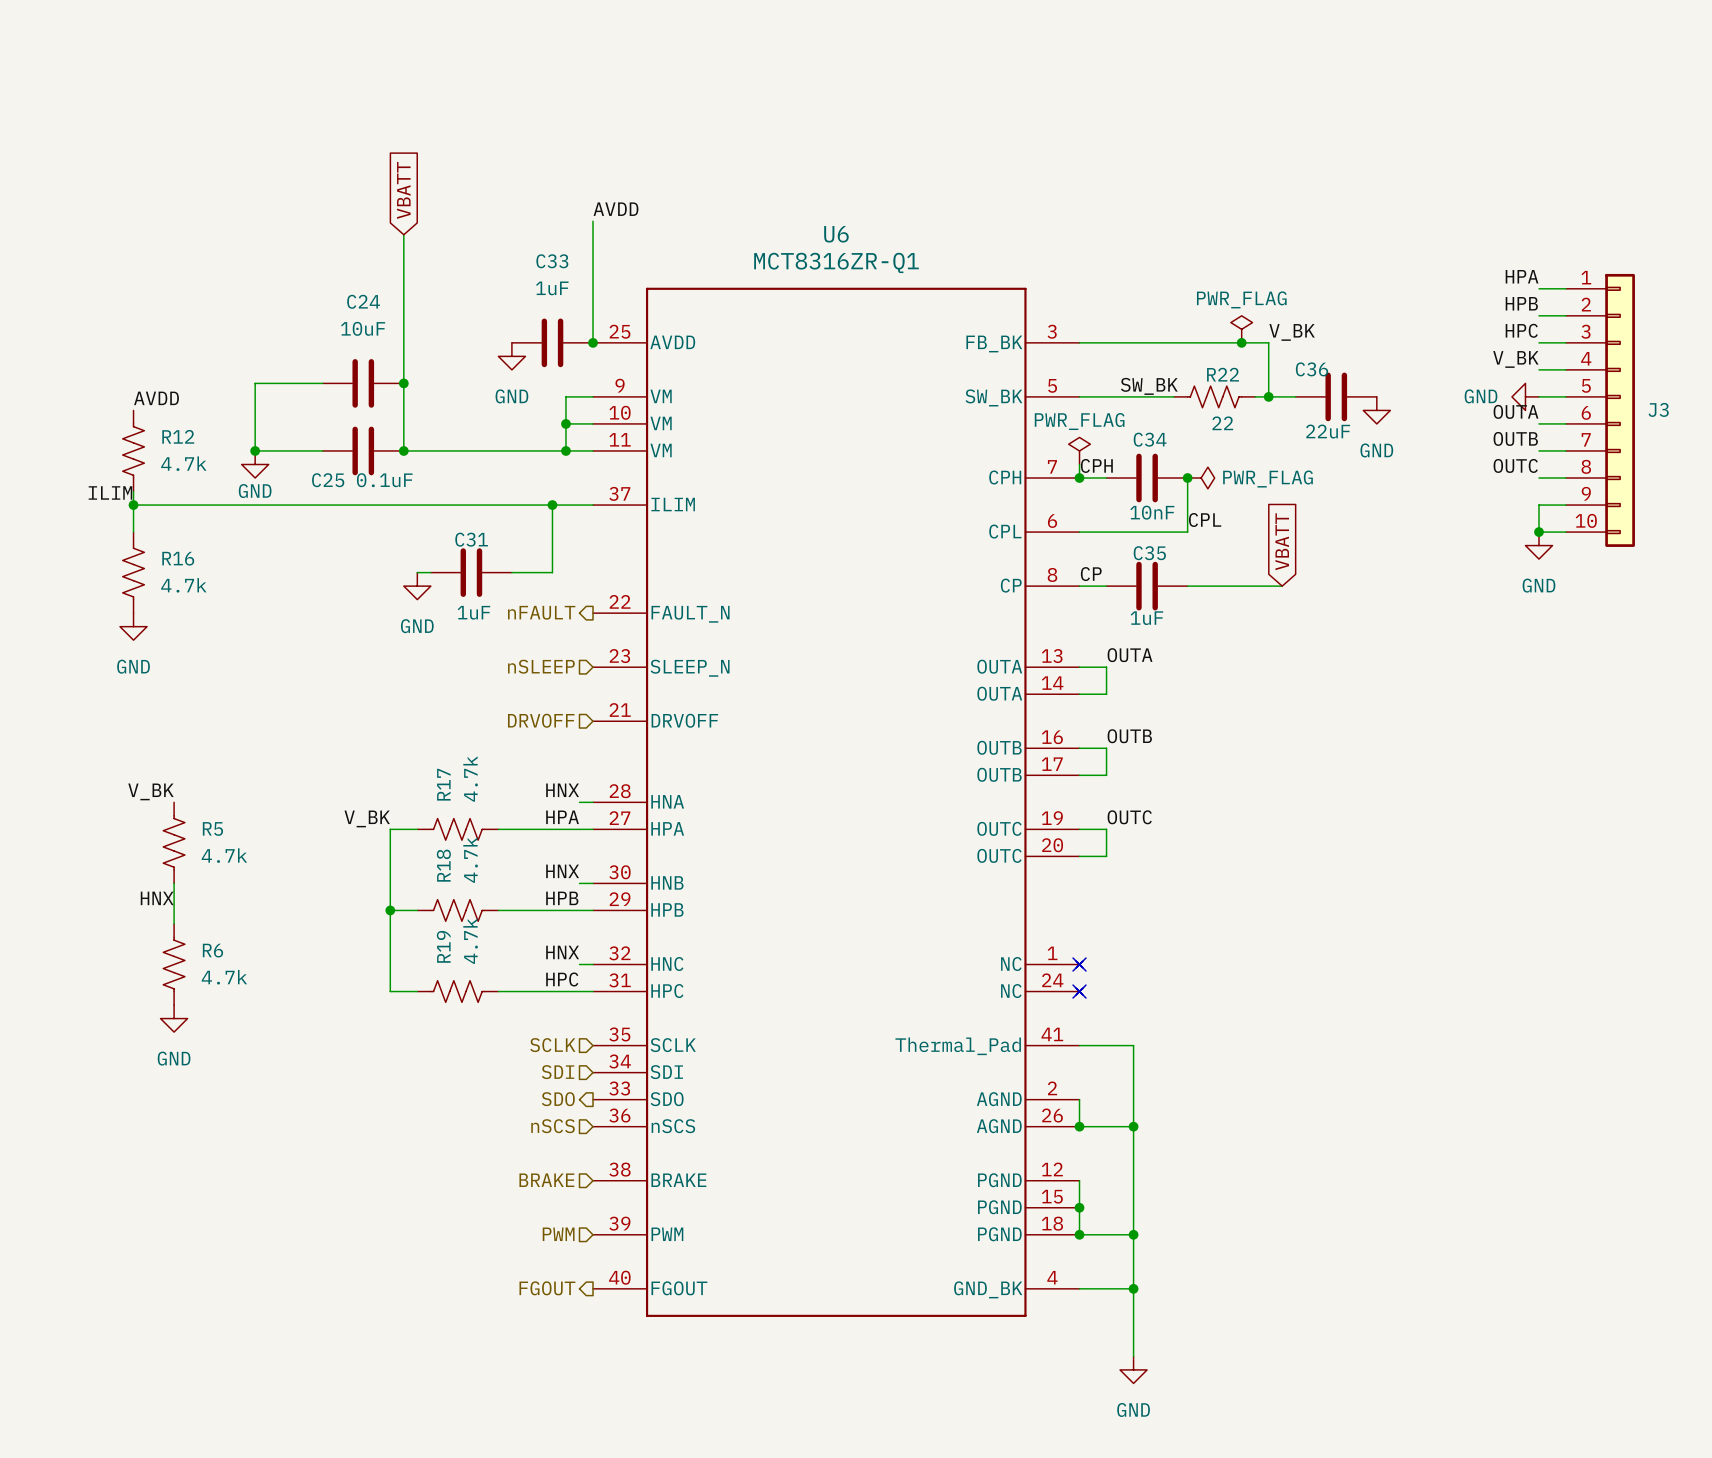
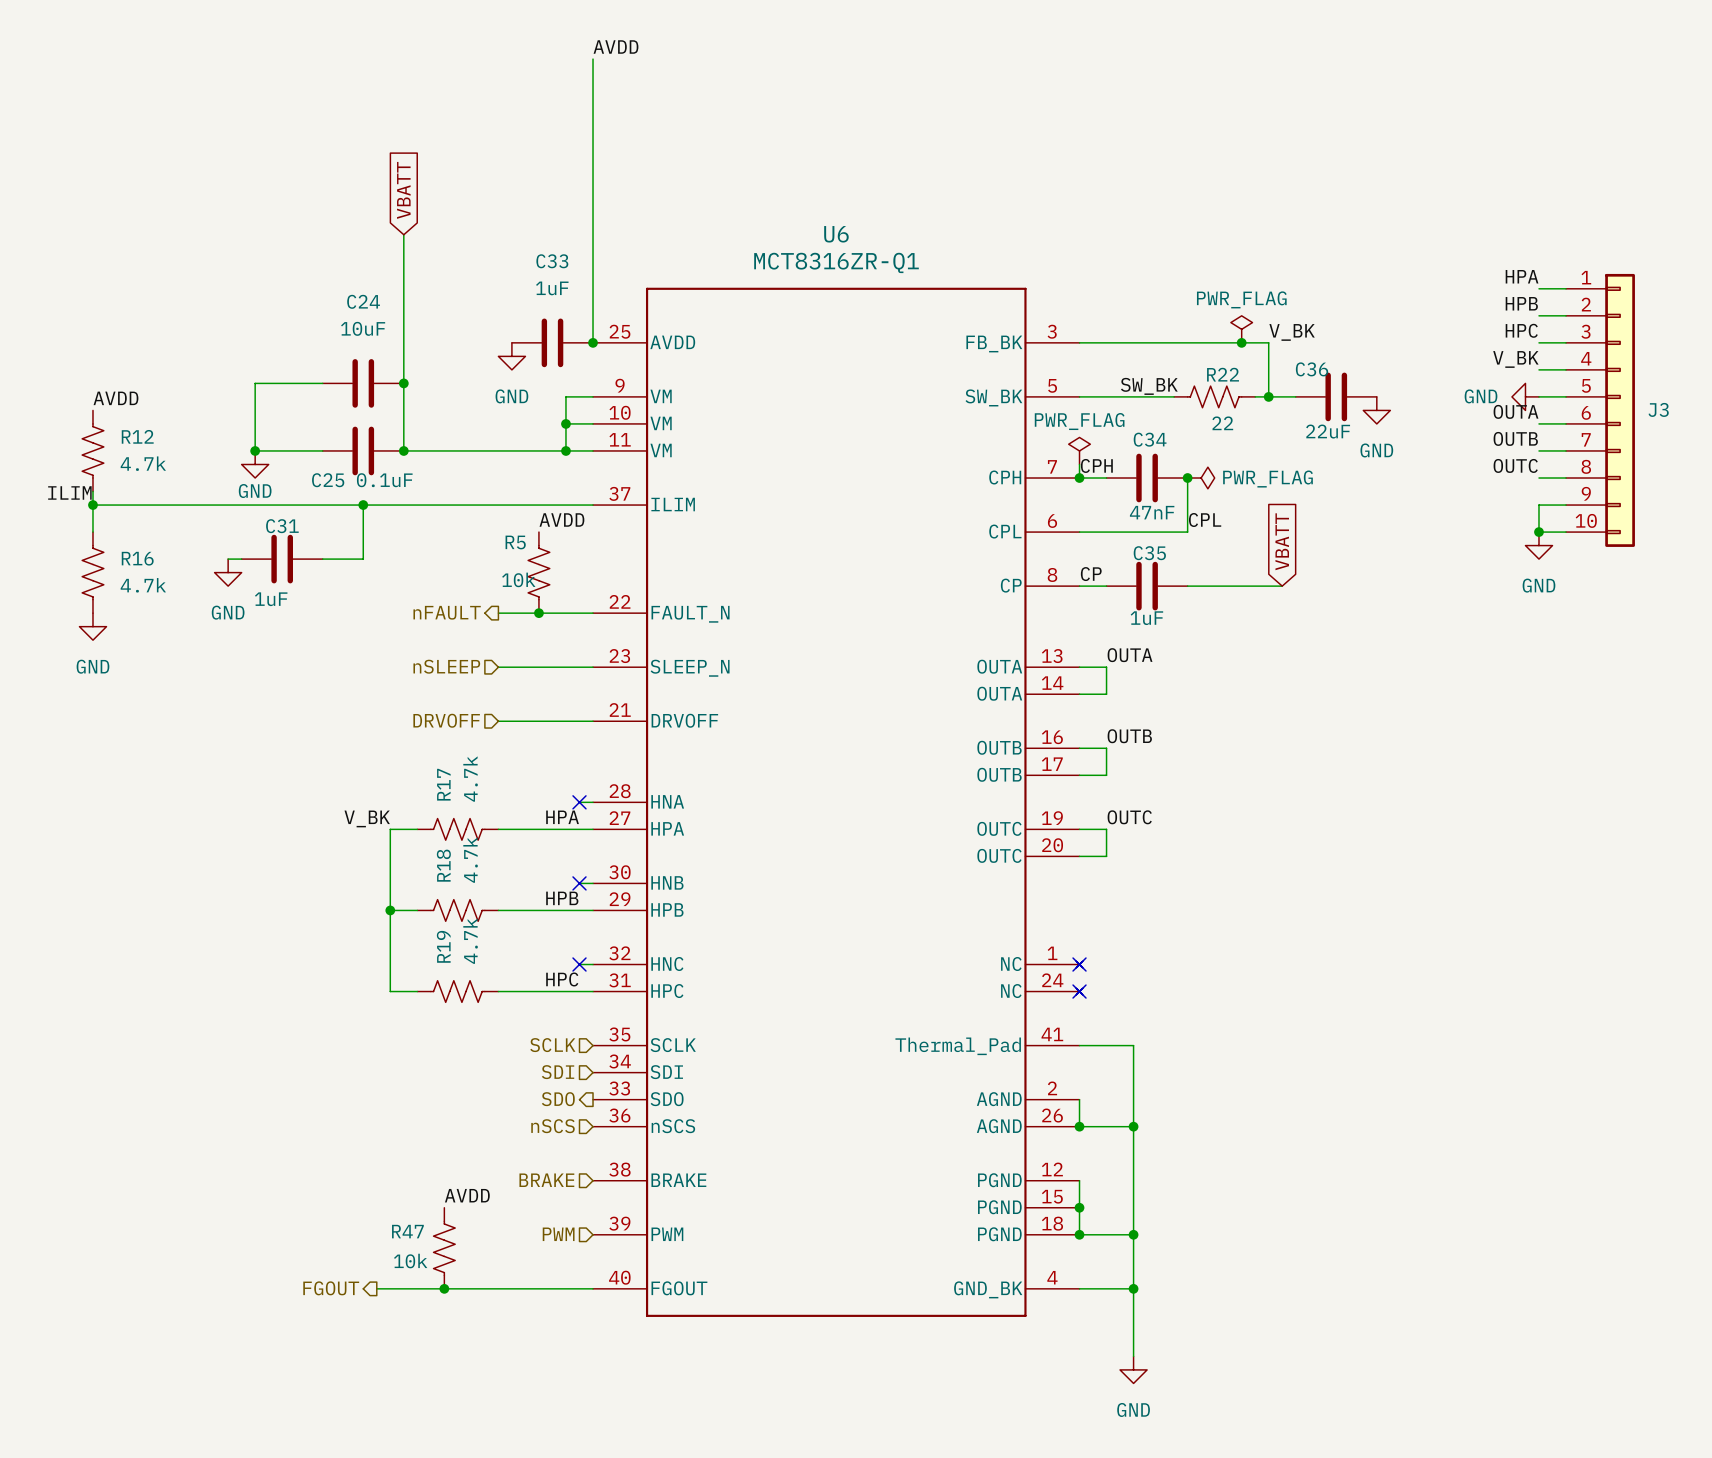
label: none -> AVDD (616, 47)
wire: none -> (593, 59) (593, 221)
label: AVDD (616, 209) -> none
label position: AVDD (156, 398) -> AVDD (115, 398)
R12 position: (133, 450) -> (92, 450)
wire: (133, 491) (133, 532) -> (92, 491) (92, 532)
label position: ILIM (110, 492) -> ILIM (69, 492)
wire: none -> (92, 505) (133, 505)
junction position: (133, 505) -> (92, 505)
wire: none -> (363, 505) (363, 559) (322, 559)
junction: none -> (363, 505)
wire: (552, 505) (552, 572) (511, 572) -> none
junction: (552, 505) -> none
C34 value: 10nF (1152, 512) -> 47nF (1152, 512)
label: none -> AVDD (561, 520)
R16 position: (133, 572) -> (92, 572)
power symbol: none -> GND (228, 572)
wire: (417, 572) (430, 572) -> (228, 559) (241, 559)
C31 position: (471, 572) -> (282, 559)
power symbol: GND (417, 586) -> none
C31 value position: 1uF (473, 612) -> 1uF (271, 599)
hierarchical label position: nFAULT (541, 612) -> nFAULT (447, 612)
wire: none -> (498, 613) (593, 613)
junction: none -> (538, 613)
power symbol position: GND (133, 626) -> GND (92, 626)
hierarchical label position: nSLEEP (541, 666) -> nSLEEP (446, 666)
wire: none -> (498, 667) (593, 667)
hierarchical label position: DRVOFF (541, 720) -> DRVOFF (446, 720)
wire: none -> (498, 721) (593, 721)
label: HNX (562, 790) -> none
label: V_BK (150, 791) -> none
no-connect mark: none -> (579, 802)
R5 name position: R5 (212, 828) -> R5 (515, 542)
R5 position: (174, 842) -> (538, 572)
R5 value: 4.7k (224, 855) -> 10k (518, 579)
label: HNX (562, 871) -> none
wire: (174, 883) (174, 923) -> none
no-connect mark: none -> (579, 883)
label: HNX (157, 898) -> none
label: HNX (562, 952) -> none
R6: 4.7k (174, 964) -> none
no-connect mark: none -> (579, 964)
power symbol: GND (174, 1018) -> none
label: none -> AVDD (467, 1195)
R47: none -> 10k (444, 1248)
wire: none -> (376, 1288) (593, 1288)
junction: none -> (444, 1288)
hierarchical label position: FGOUT (547, 1288) -> FGOUT (331, 1288)

